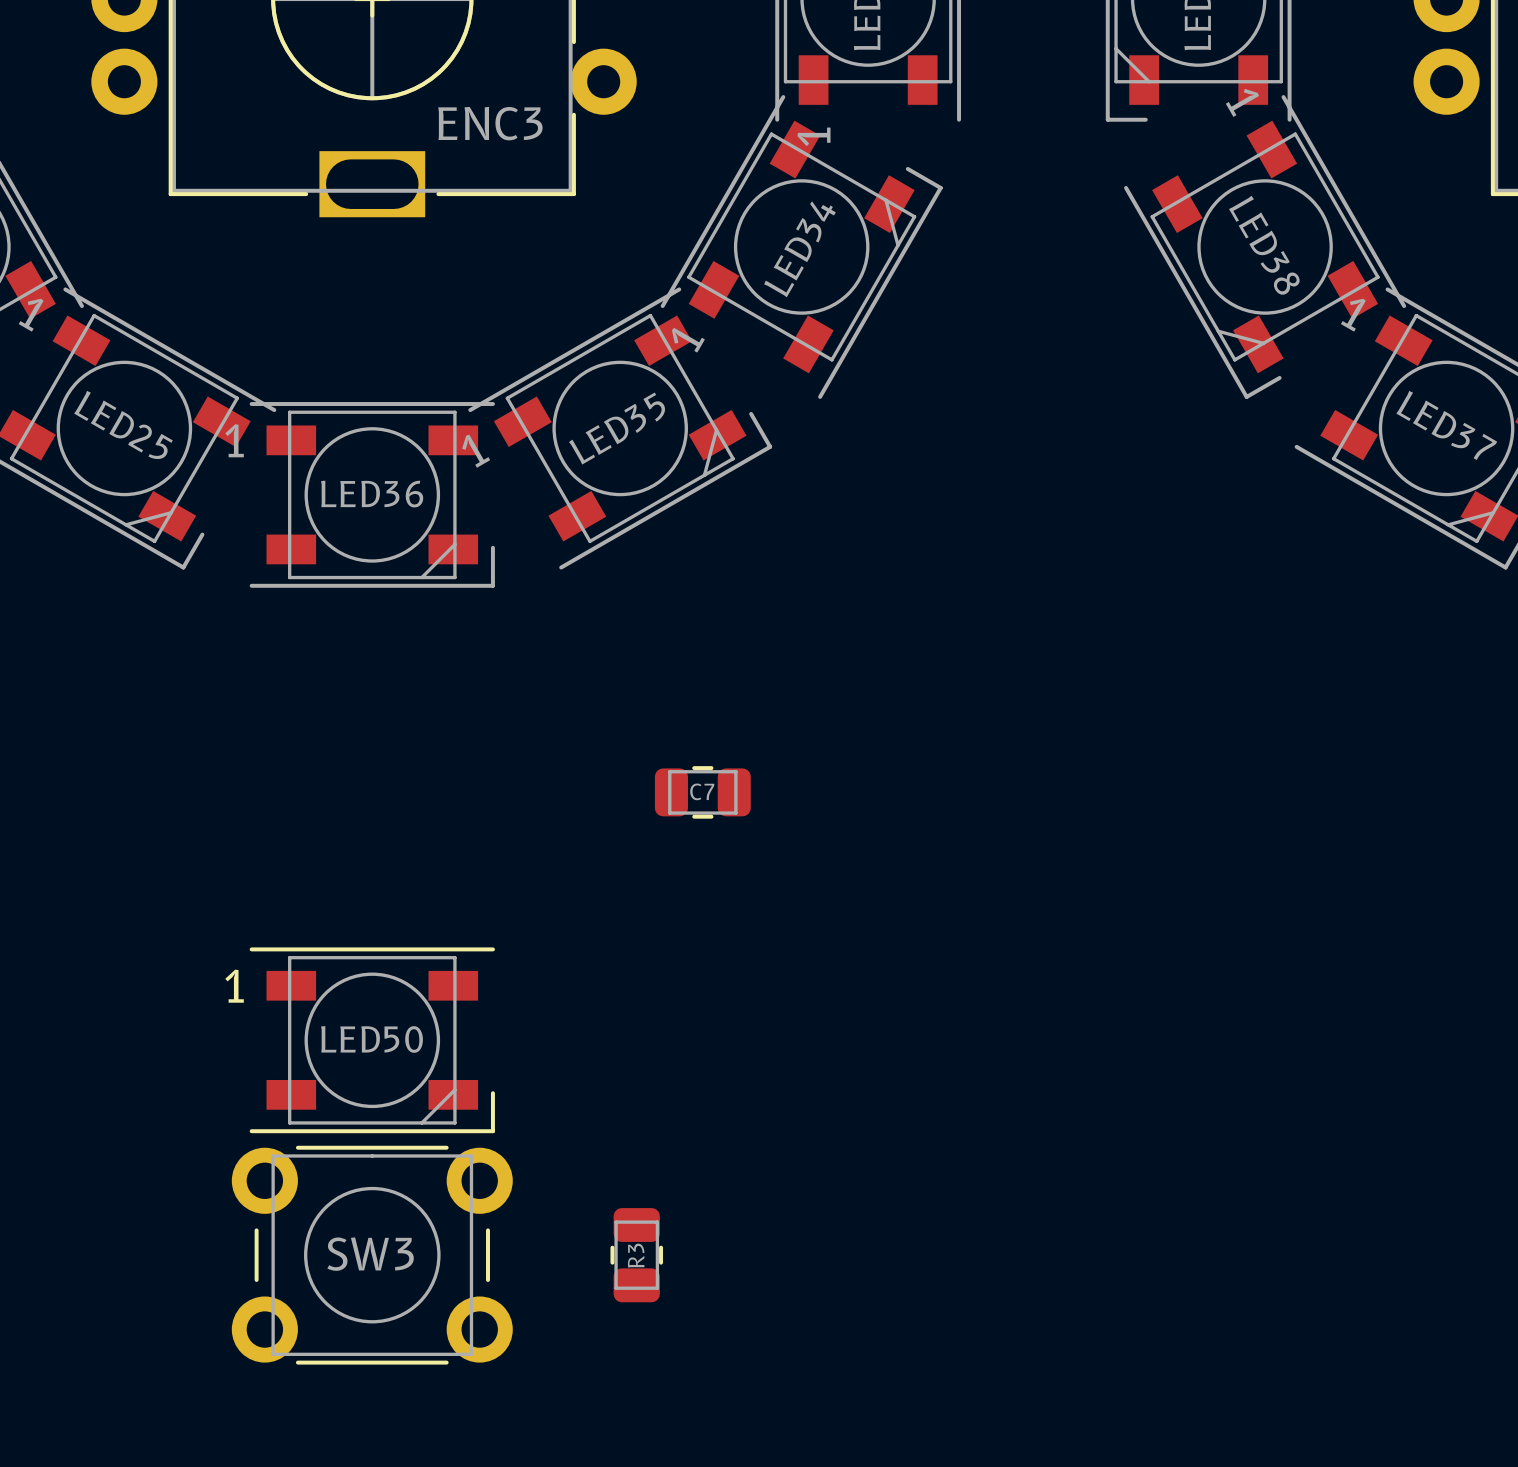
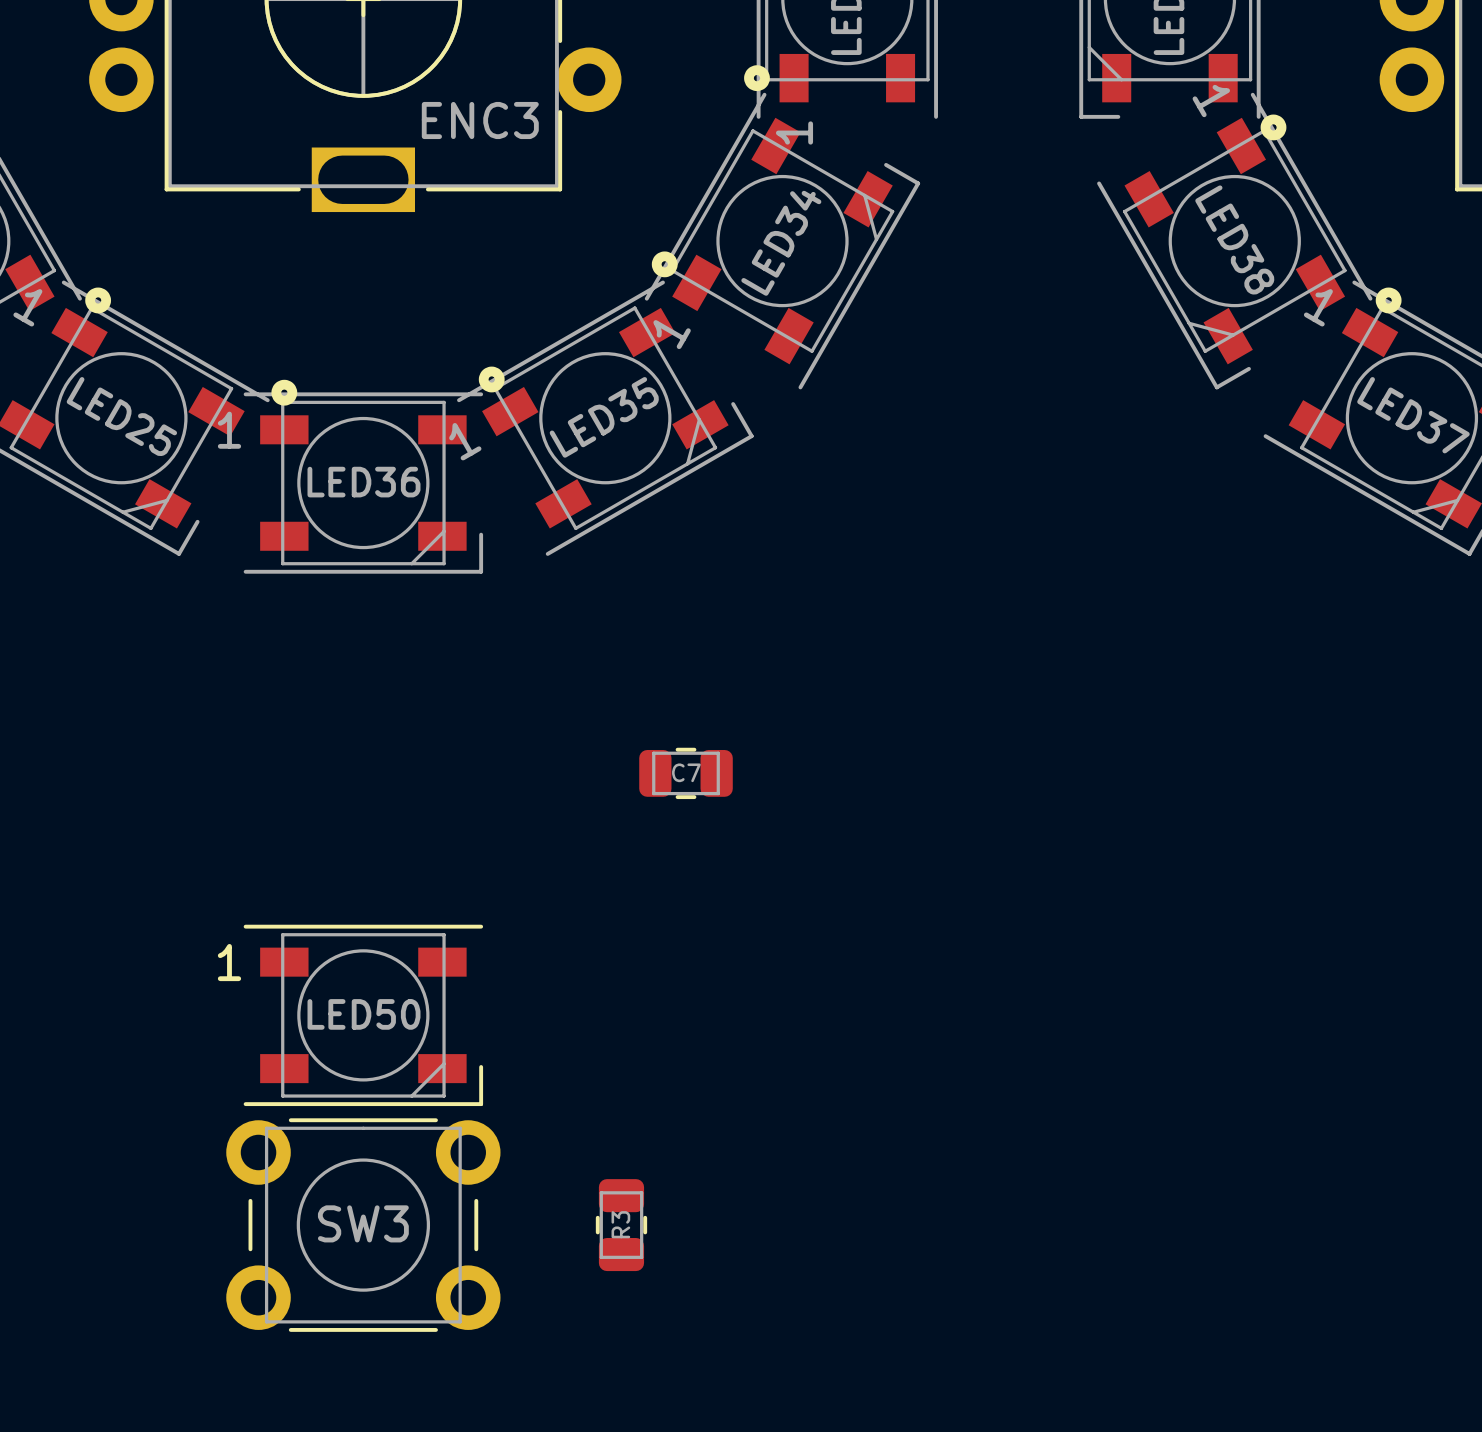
drawing: none -> [744, 65, 770, 92]
drawing: none -> [1260, 114, 1287, 141]
drawing: none -> [651, 251, 678, 278]
drawing: none -> [85, 287, 112, 314]
drawing: none -> [1375, 287, 1402, 314]
drawing: none -> [478, 366, 505, 393]
drawing: none -> [271, 379, 298, 406]

